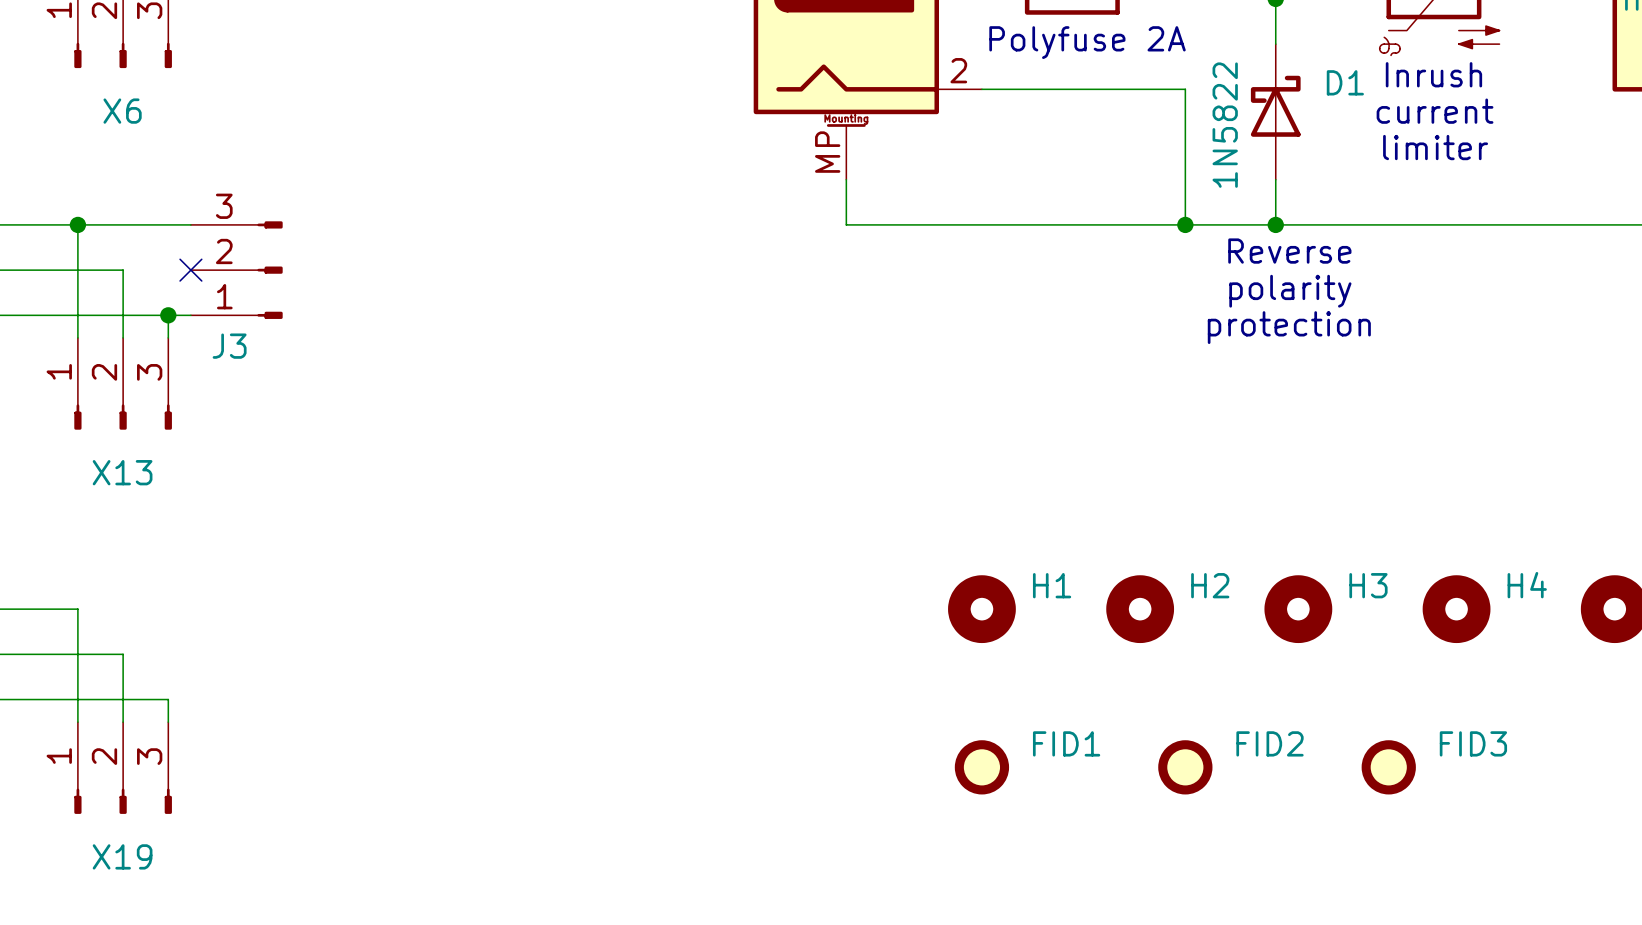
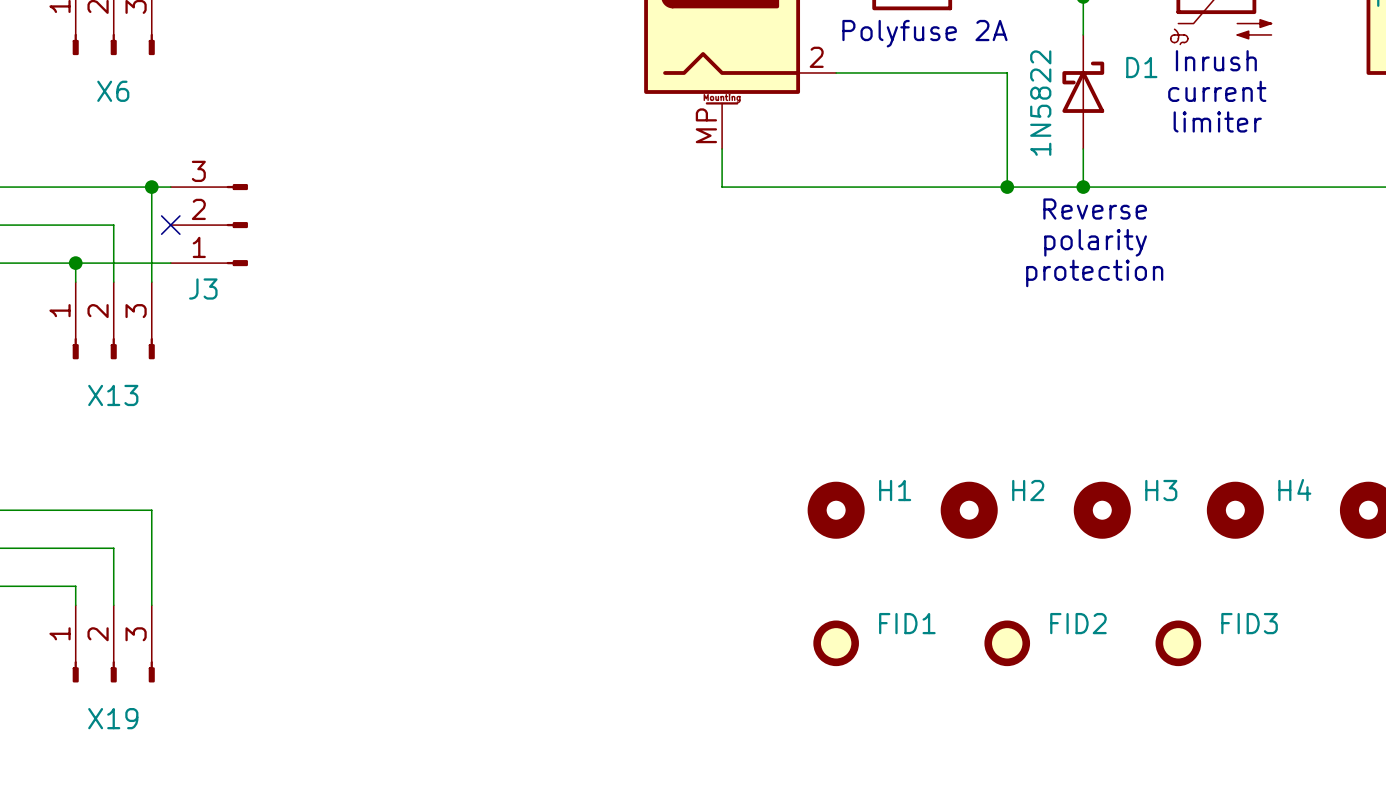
wire: (77, 224) (77, 315) -> (151, 187) (151, 263)
junction: (77, 224) -> none
junction: none -> (151, 187)
junction: none -> (75, 263)
junction: (168, 315) -> none
wire: (77, 609) (77, 699) (168, 699) -> (75, 510) (151, 510) (151, 586)

